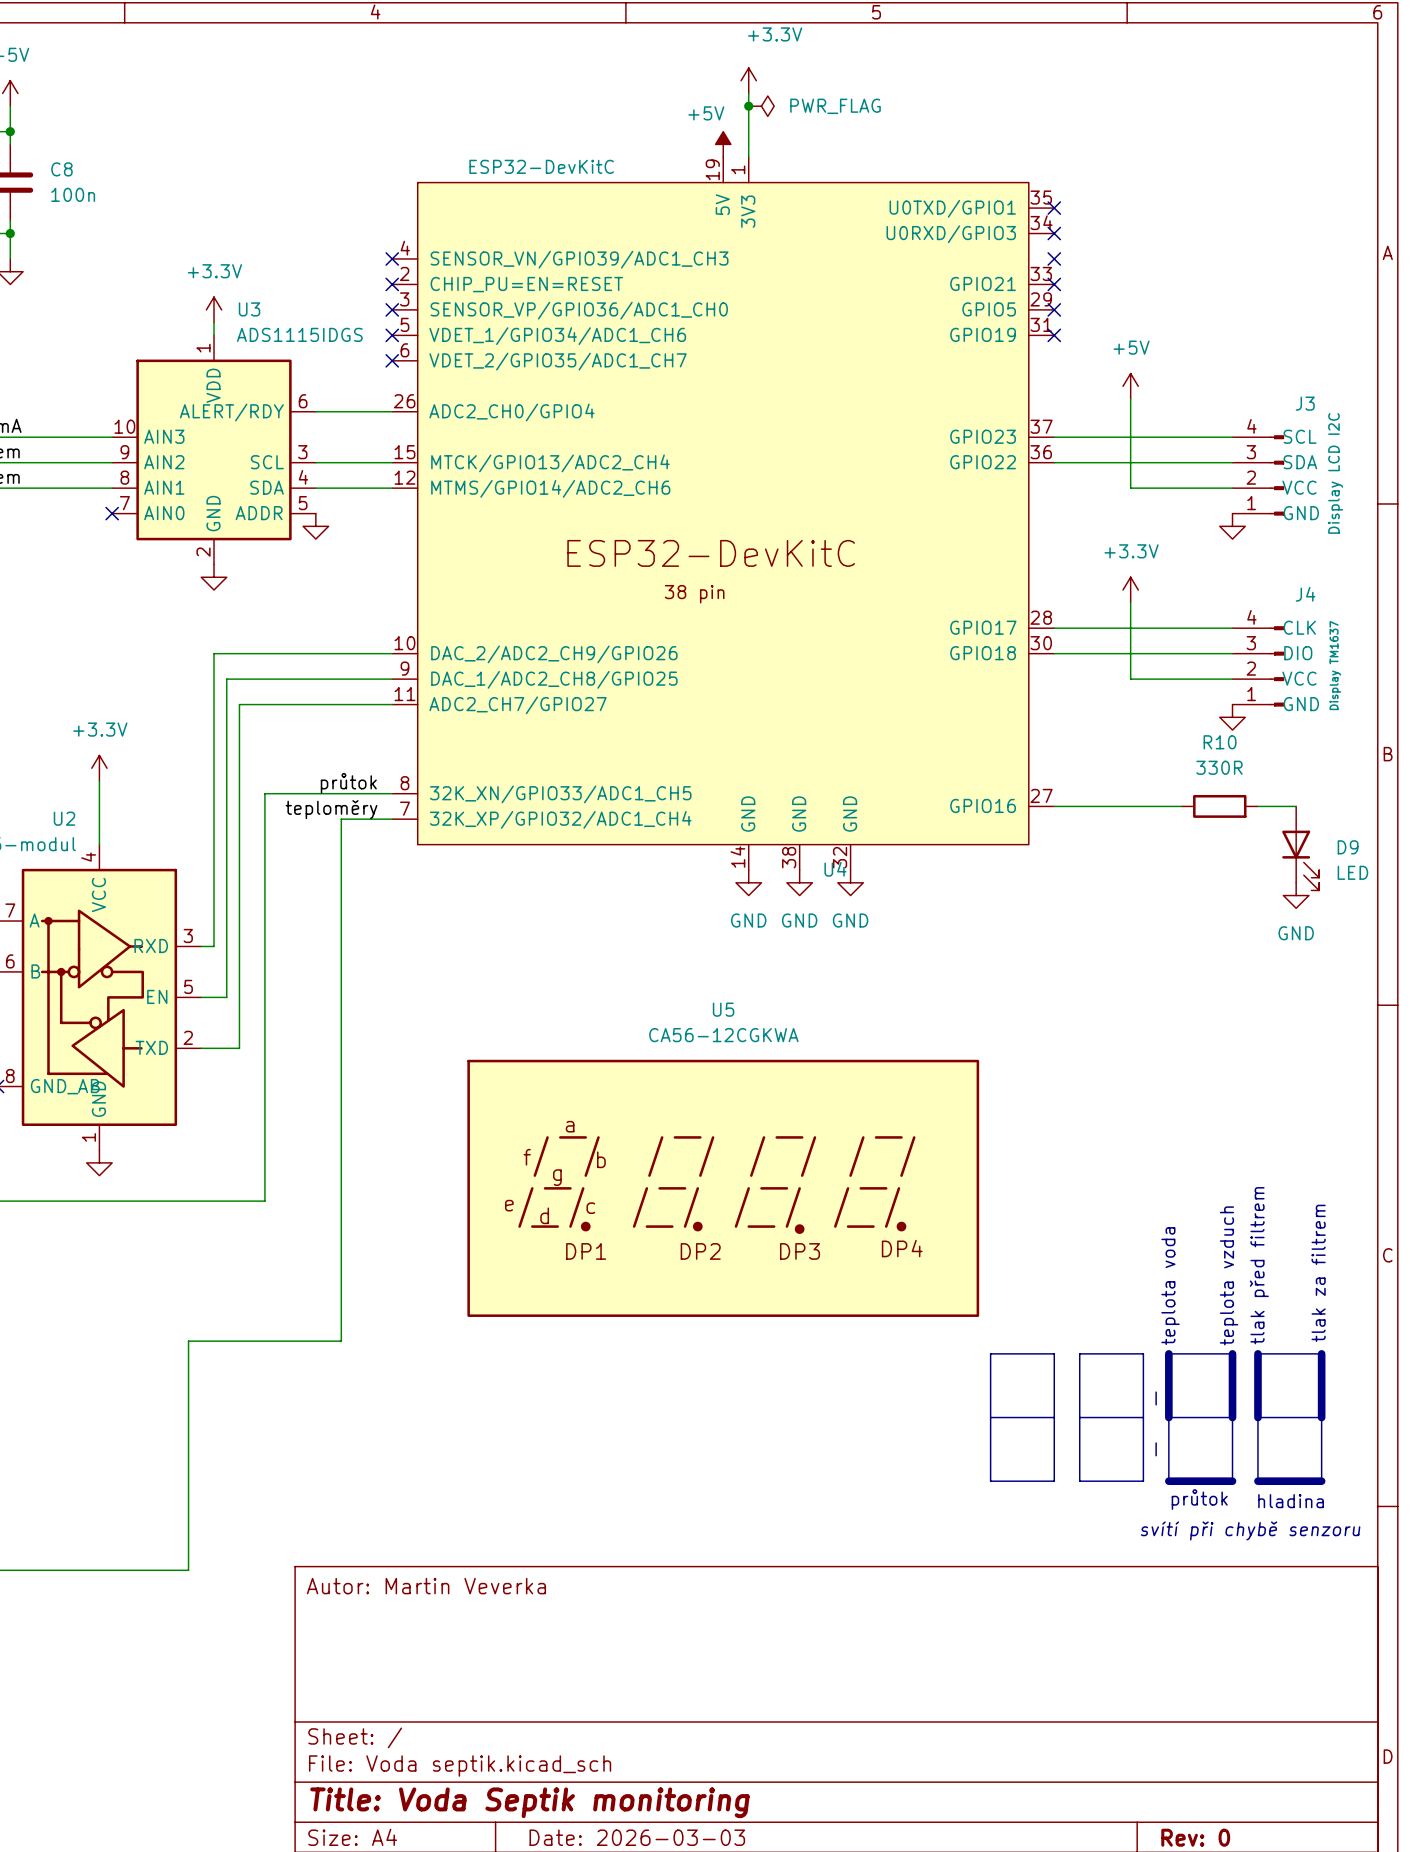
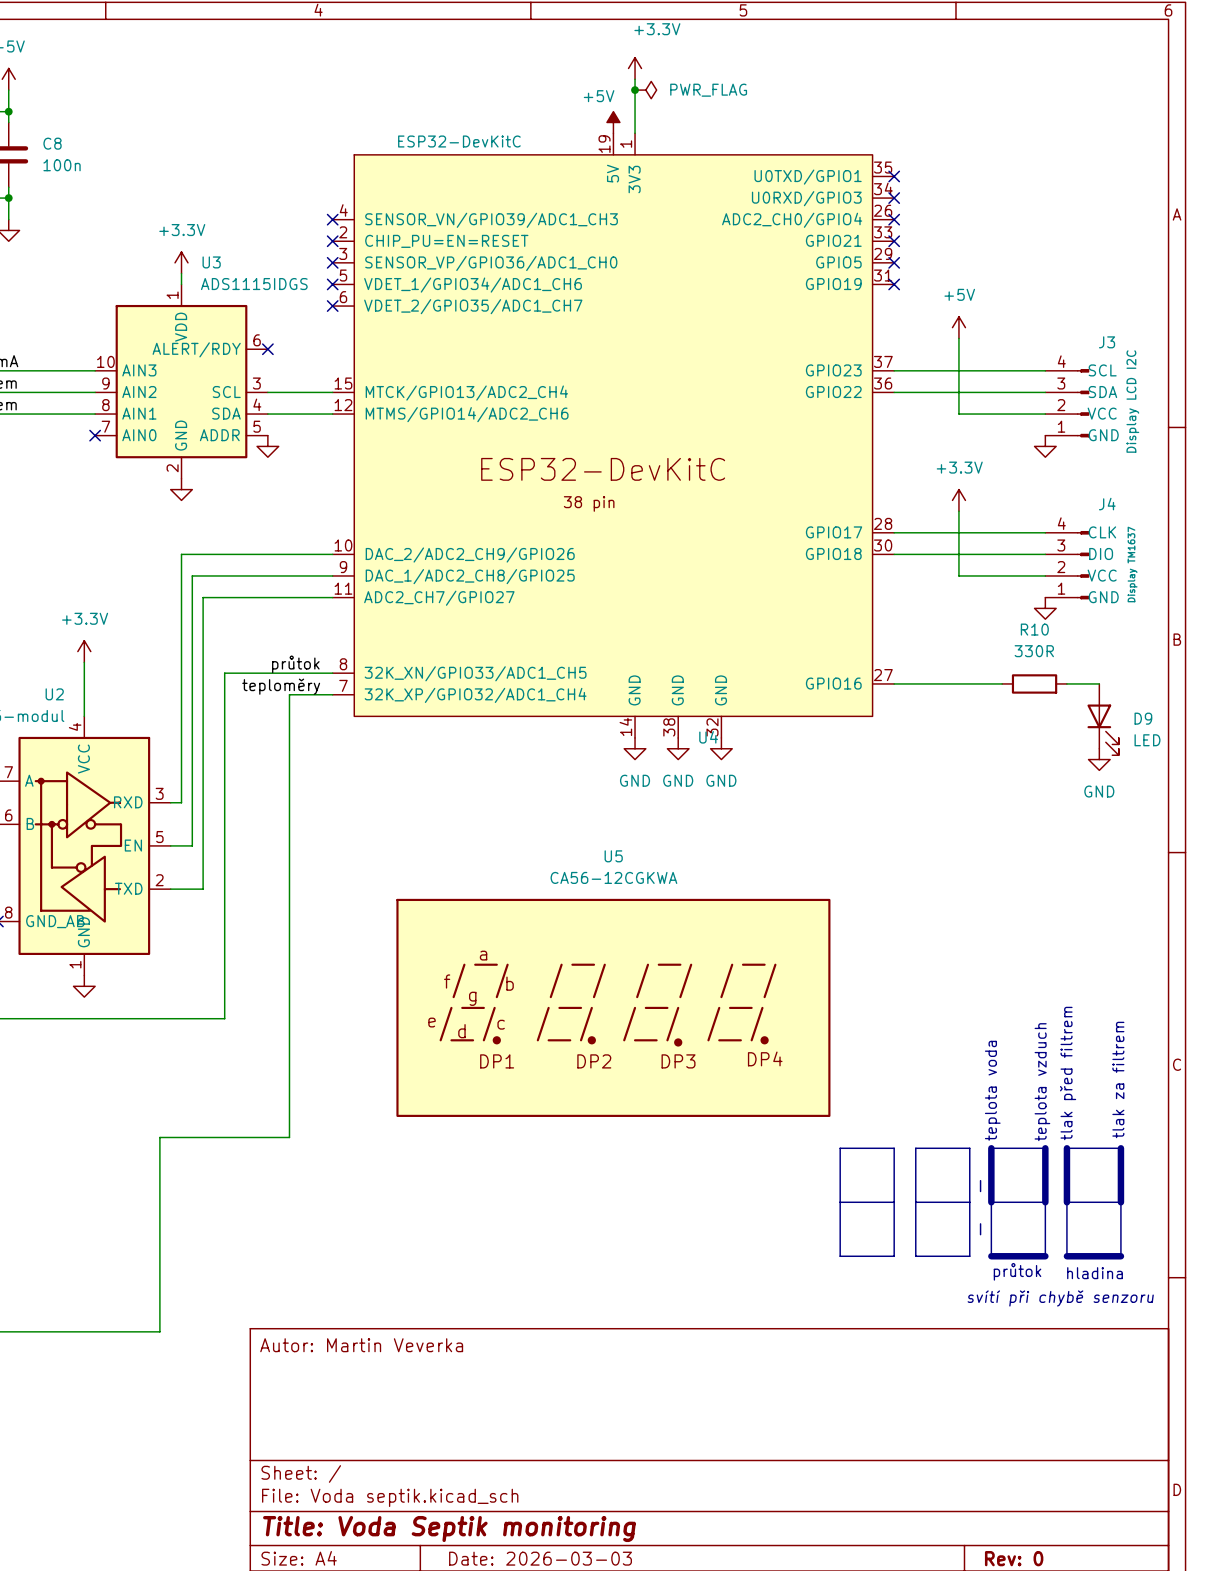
U4 symbol: [392, 157, 1055, 871] -> [332, 133, 895, 738]
wire: (315, 411) (392, 411) -> none
no-connect mark: none -> (267, 349)

